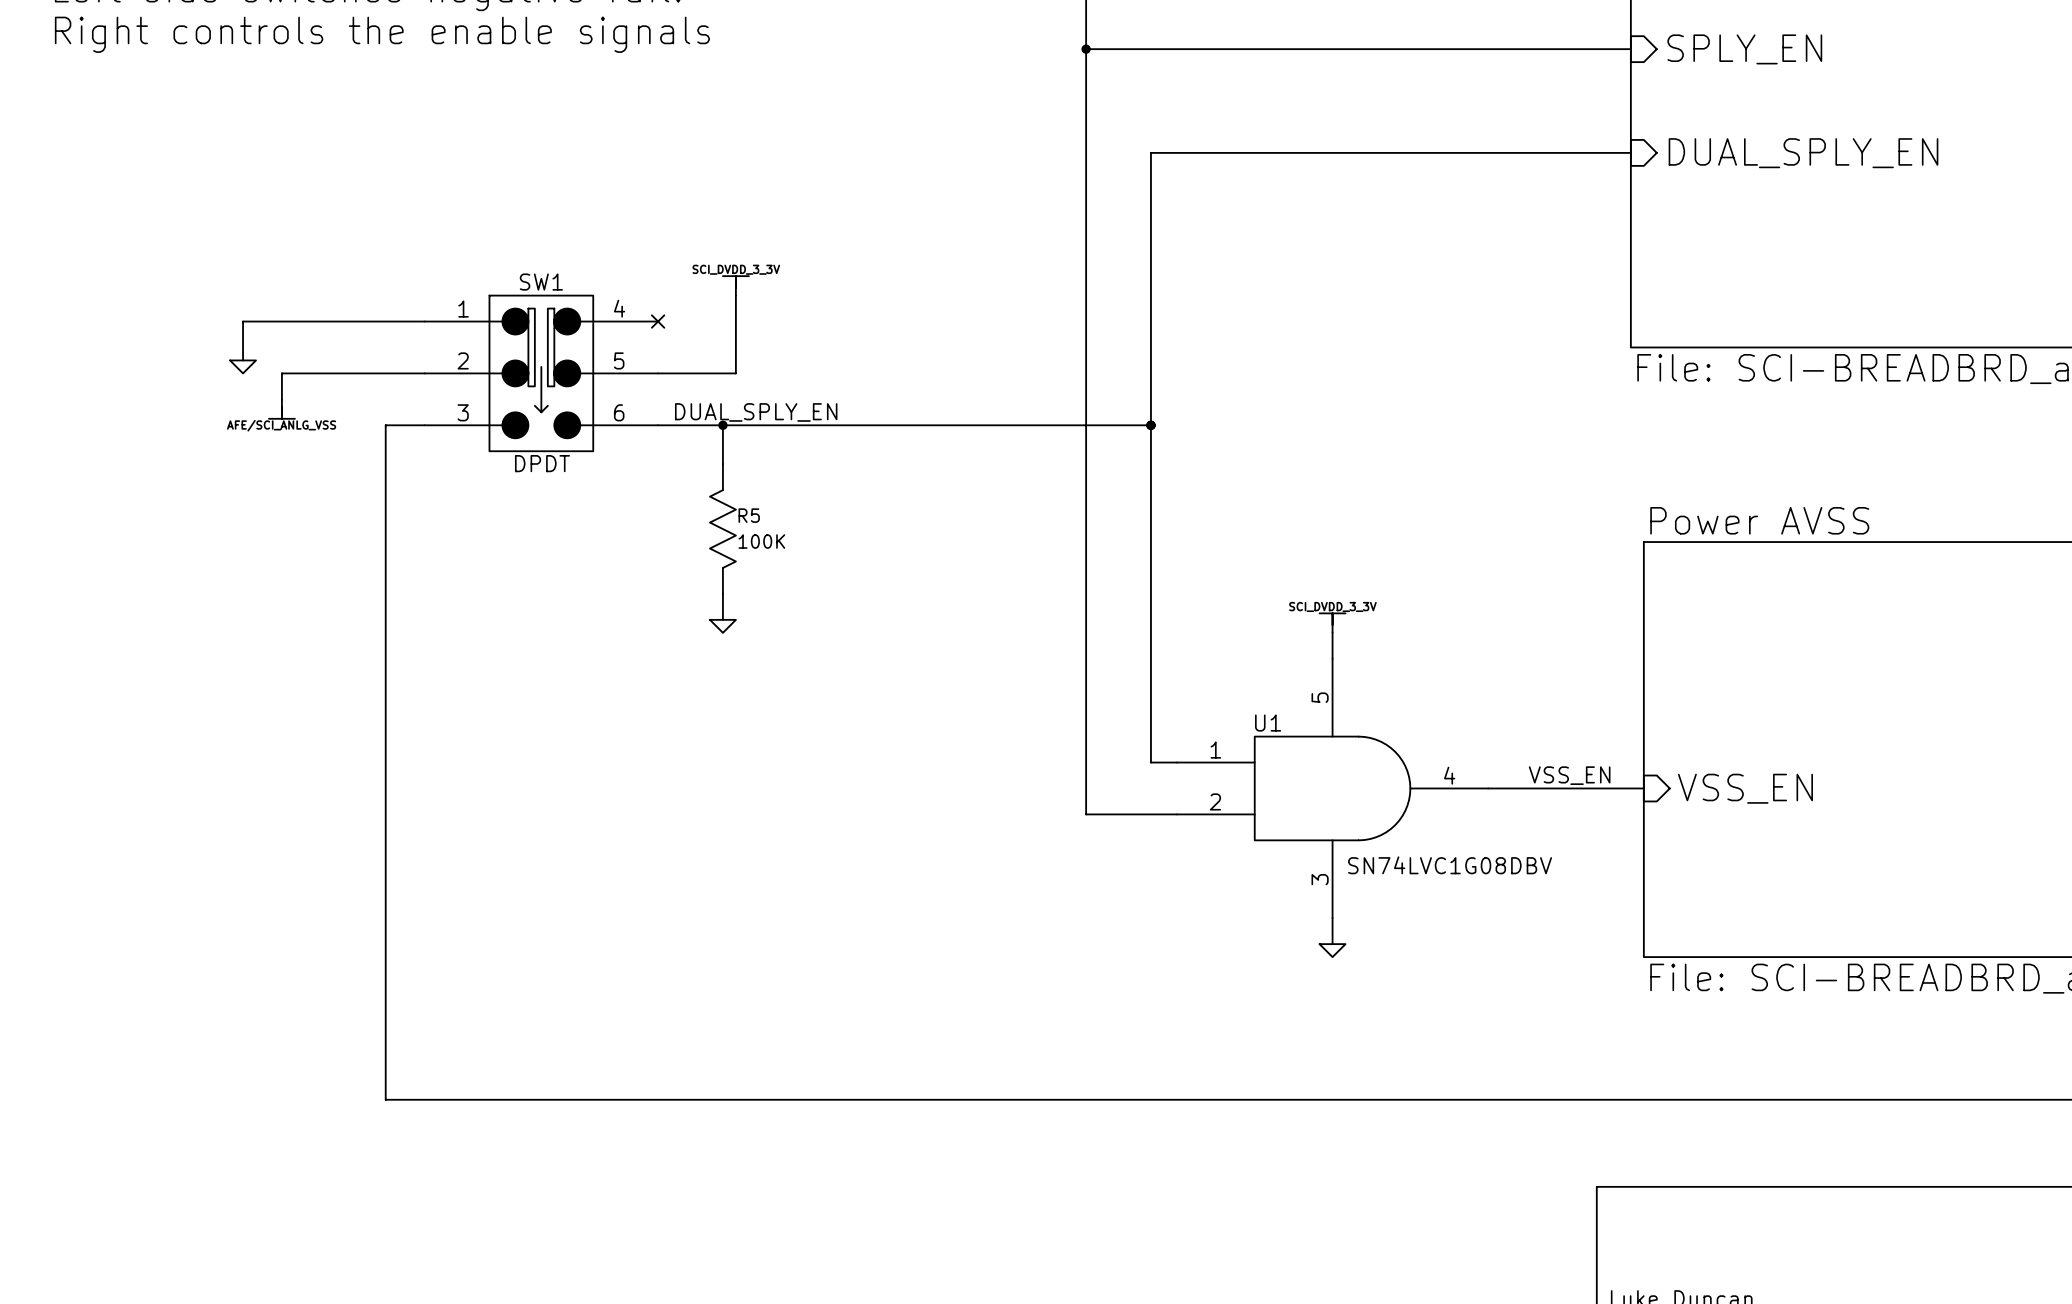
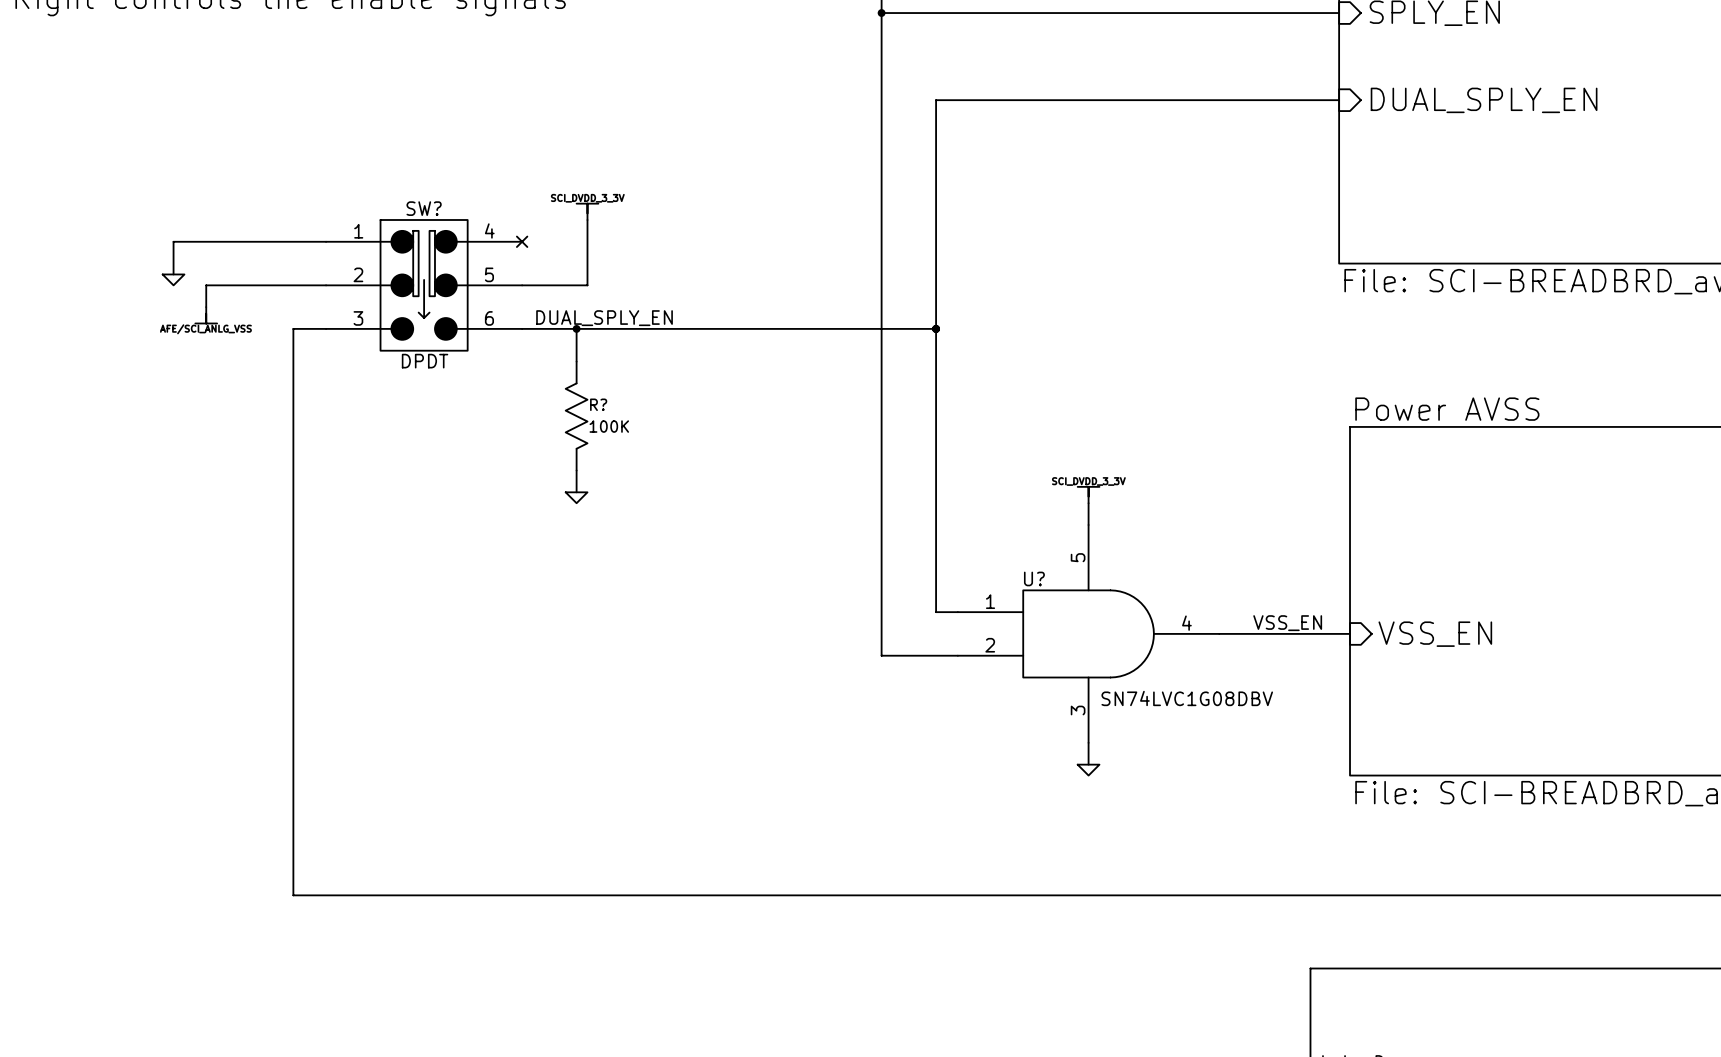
SW1 name: SW1 (541, 282) -> SW? (424, 208)
R5 name: R5 (749, 515) -> R? (598, 404)
U1 name: U1 (1268, 723) -> U? (1034, 578)

